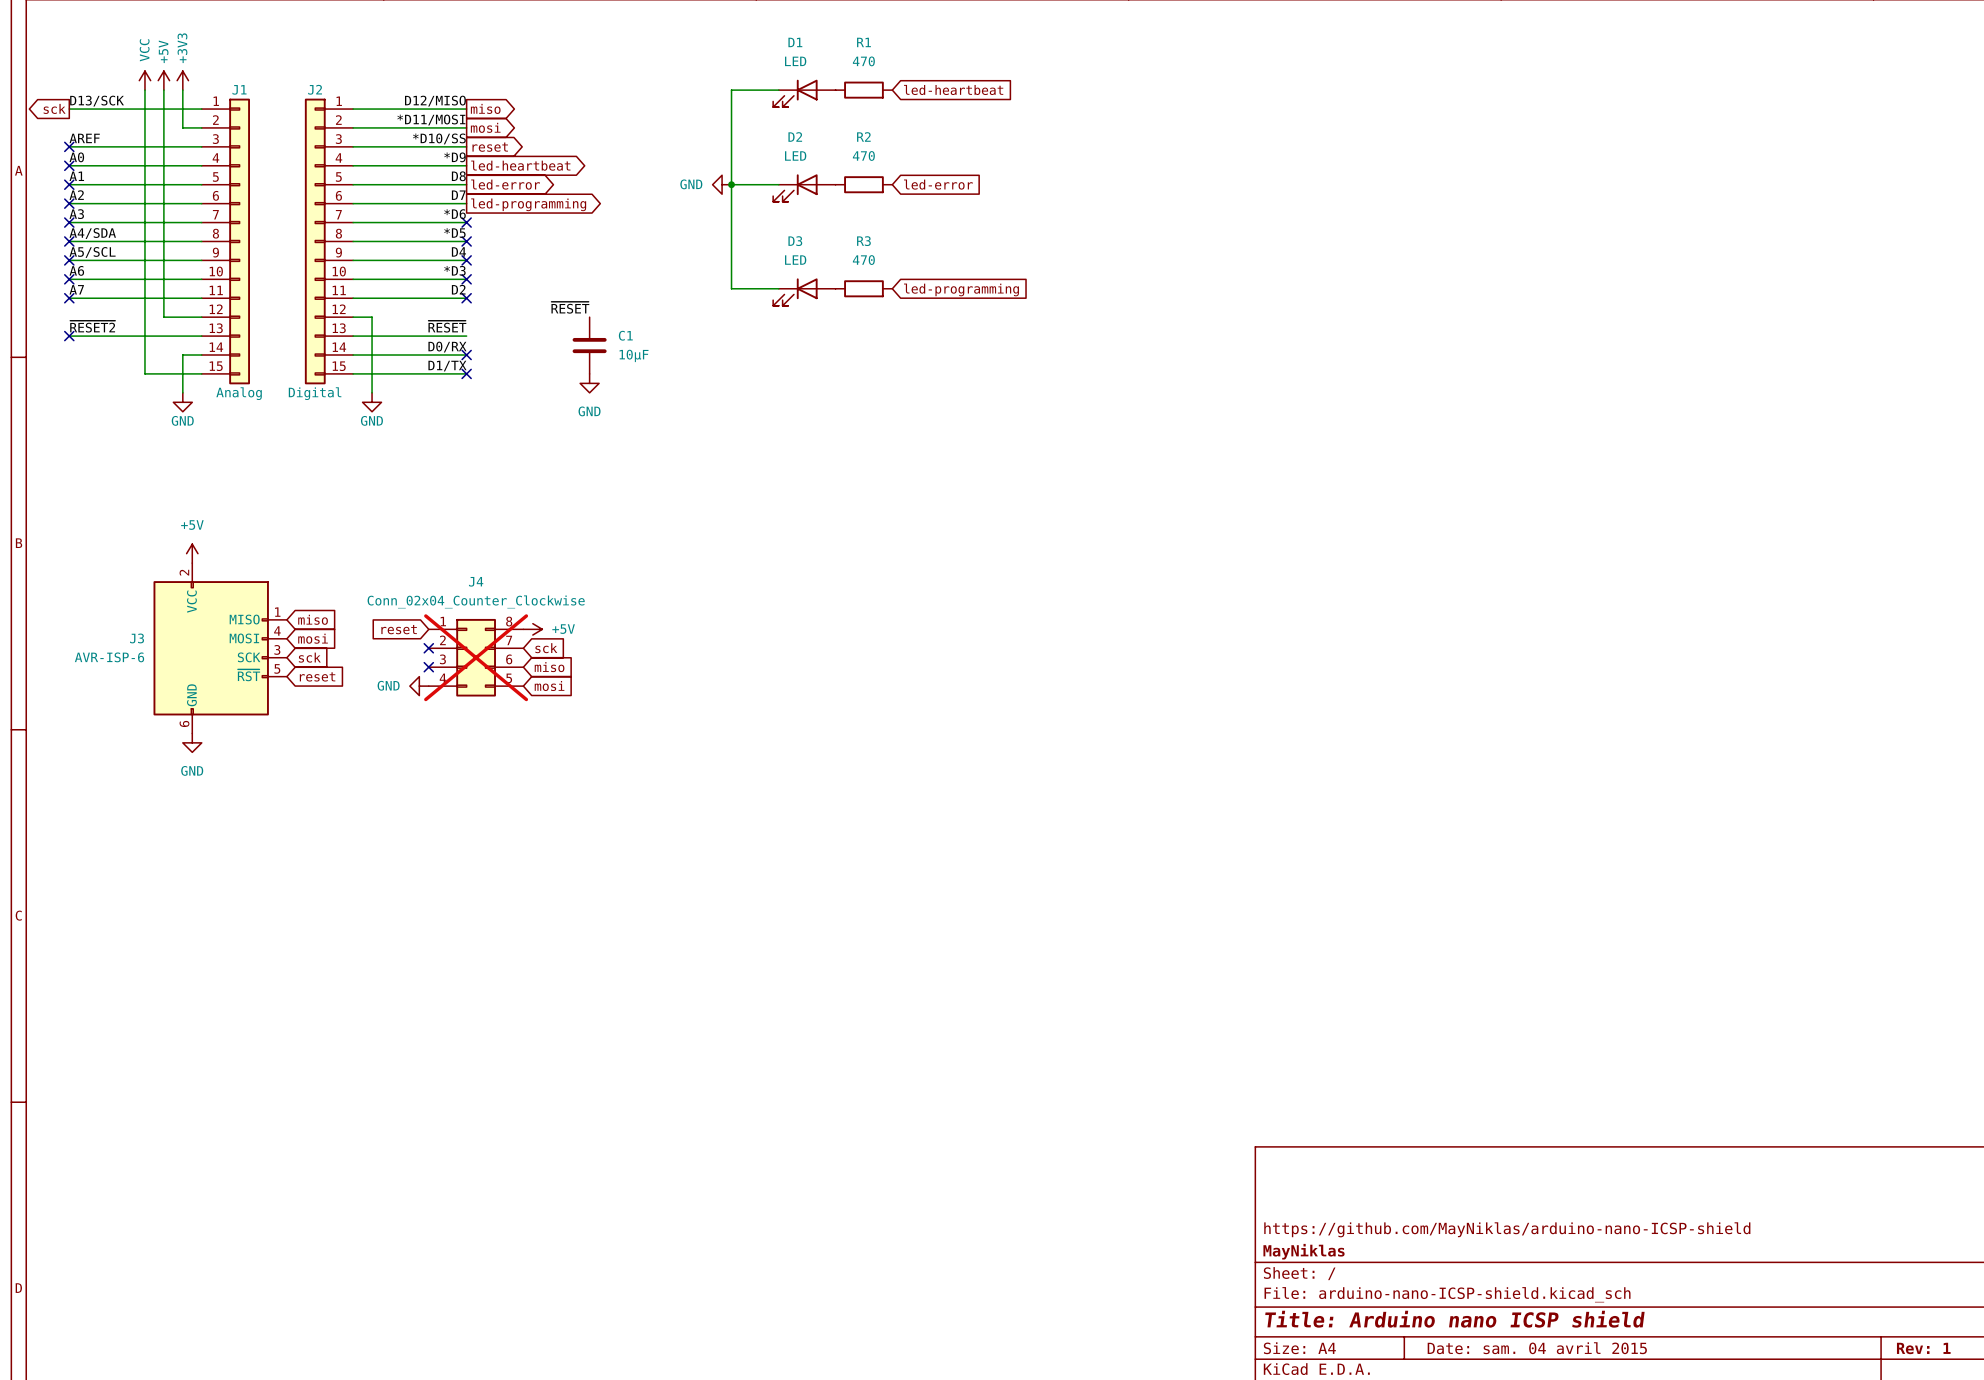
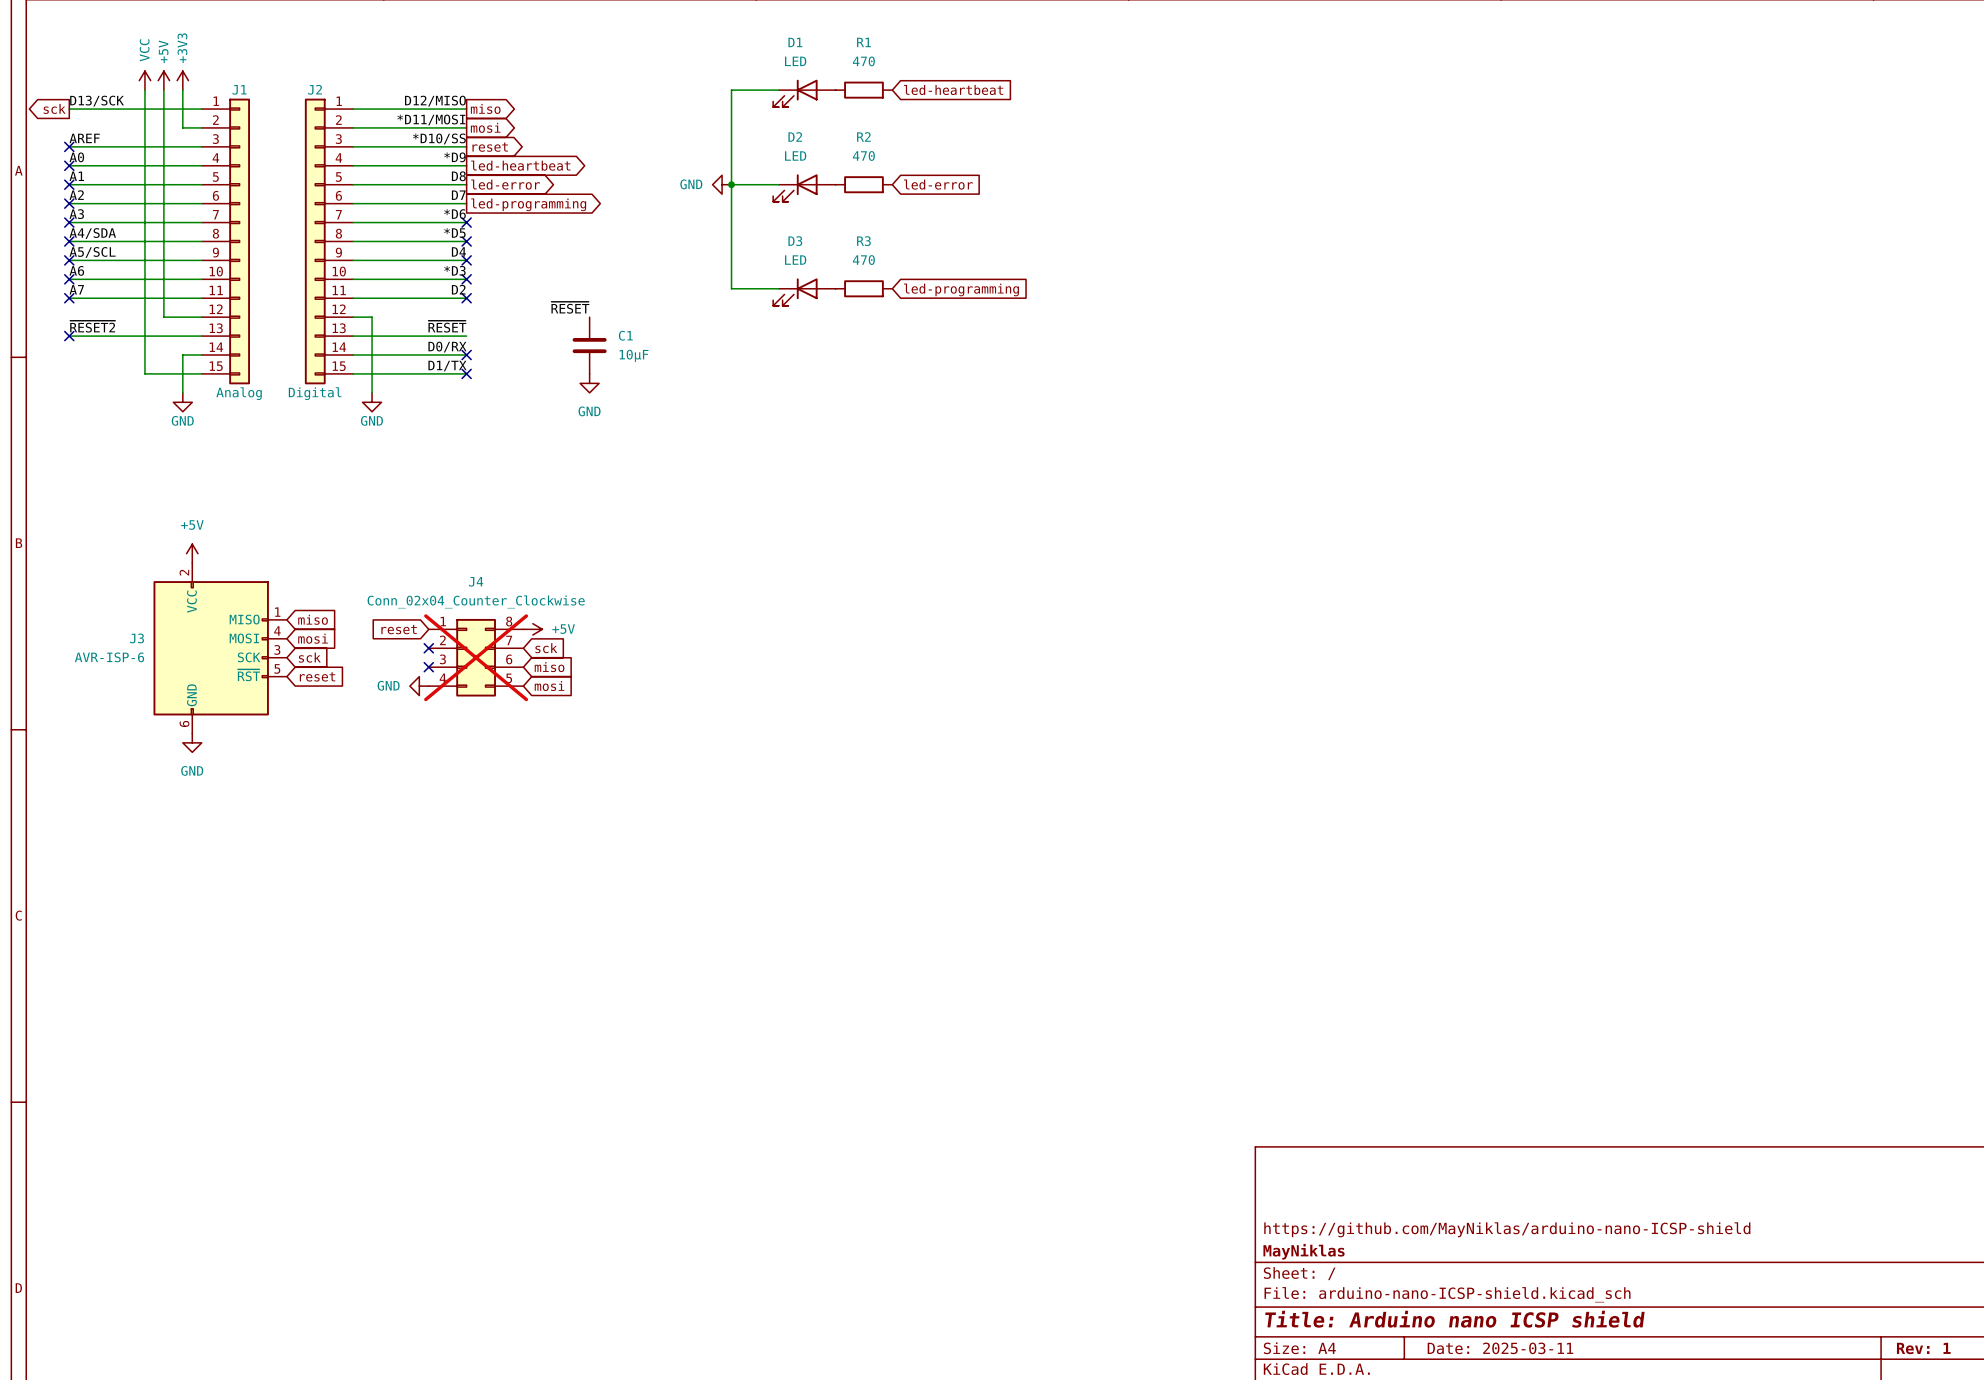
title block: Date: sam. 04 avril 2015 (1537, 1348) -> Date: 2025-03-11 (1500, 1348)

